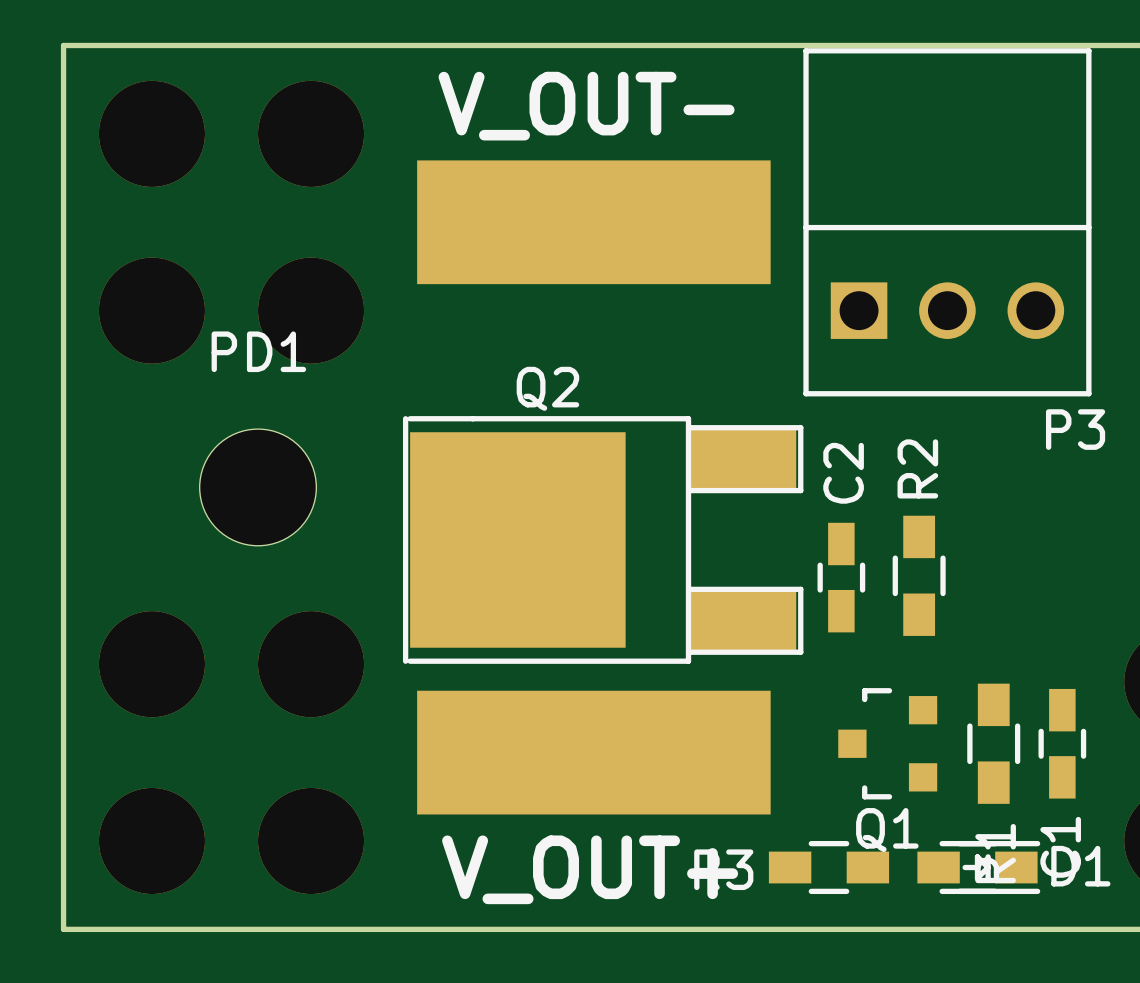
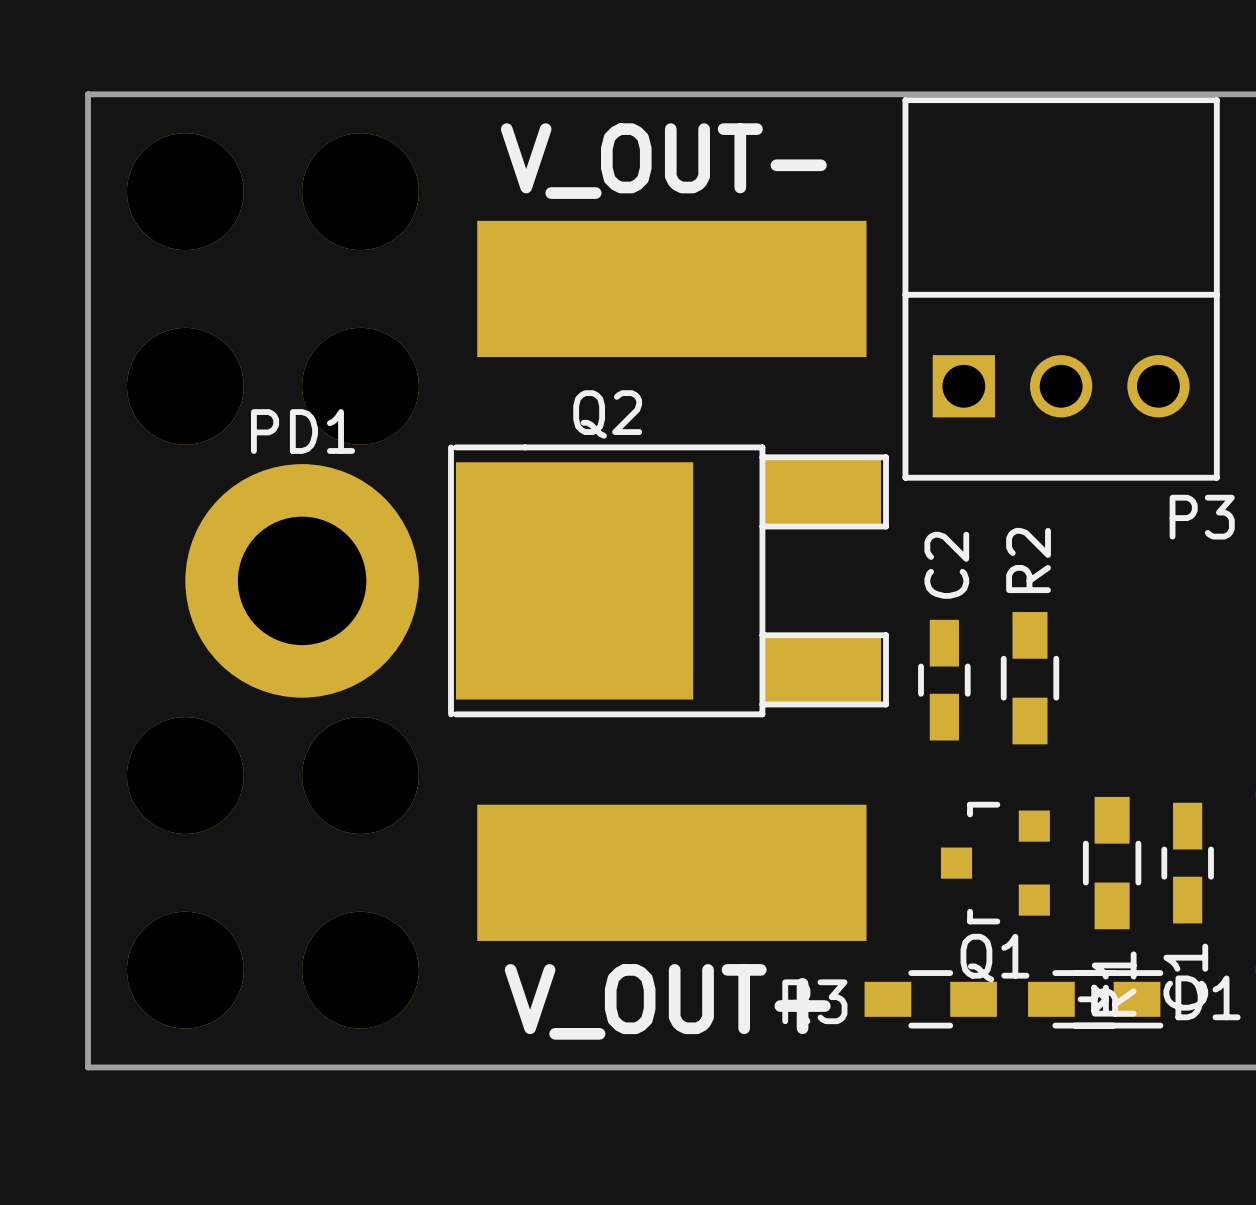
PD1 footprint: [199, 429, 317, 546] -> [185, 464, 419, 698]
Q2 position: (603, 539) -> (668, 580)

